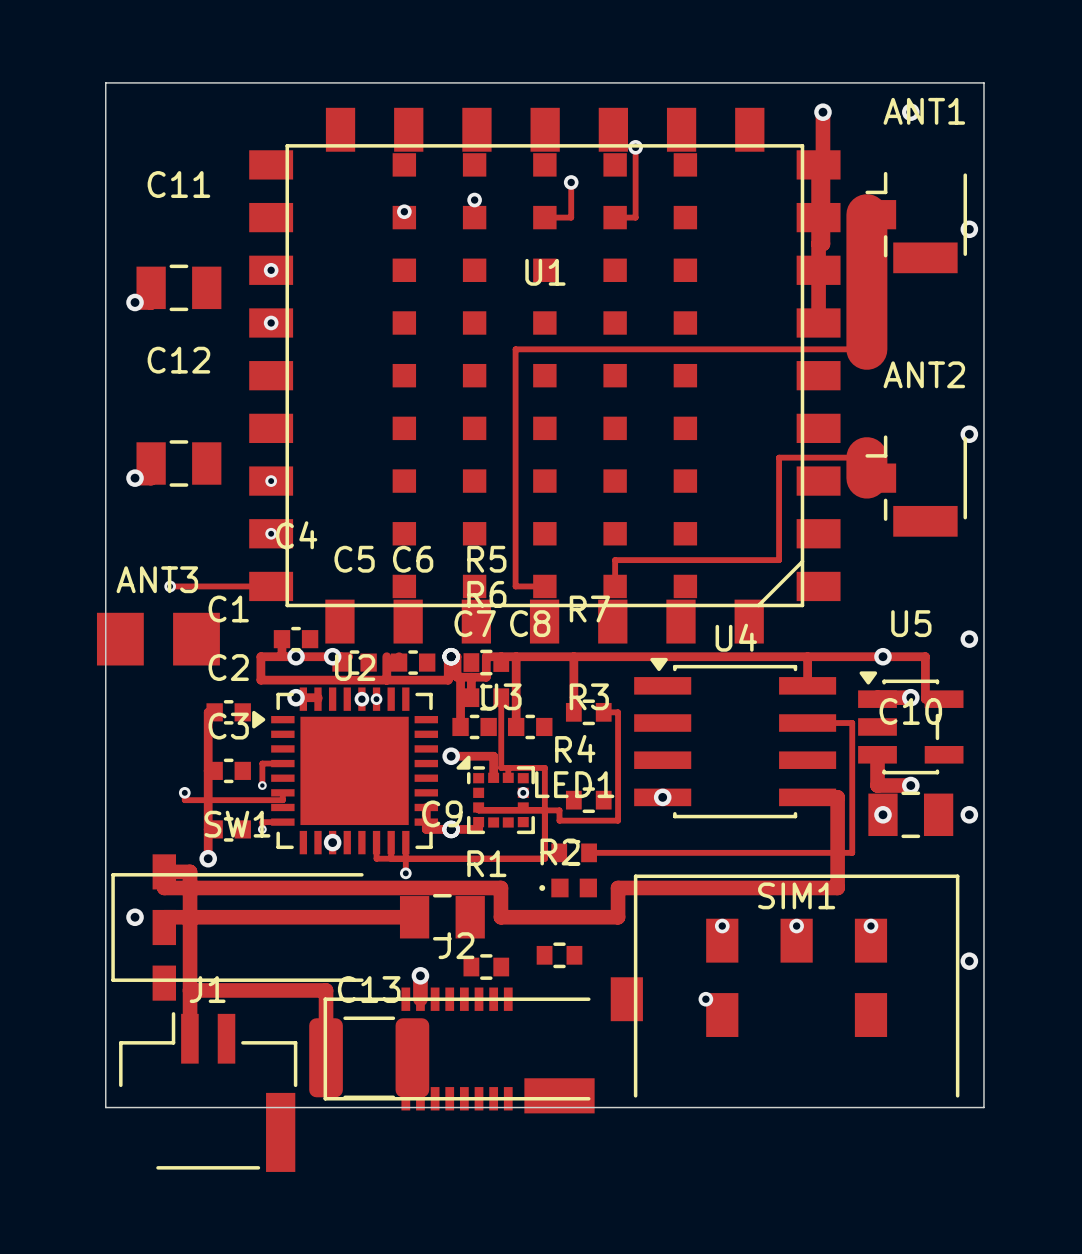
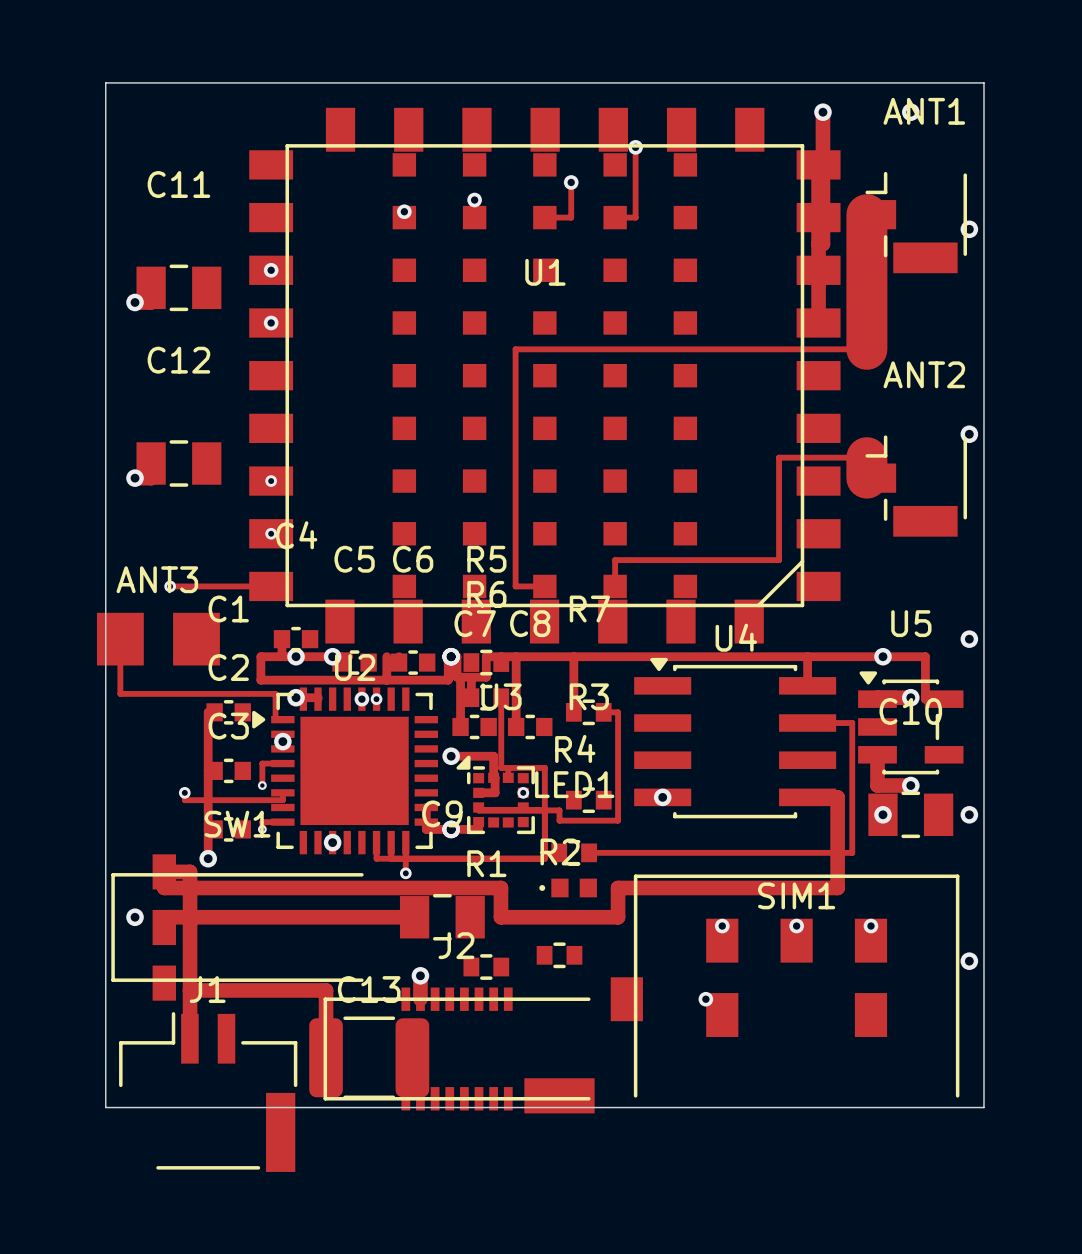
track: none -> (120, 639) (120, 693) (275, 693) (275, 719) (282, 719)
via: none -> (282, 741)
track: none -> (493, 777) (495, 792) (478, 792)

